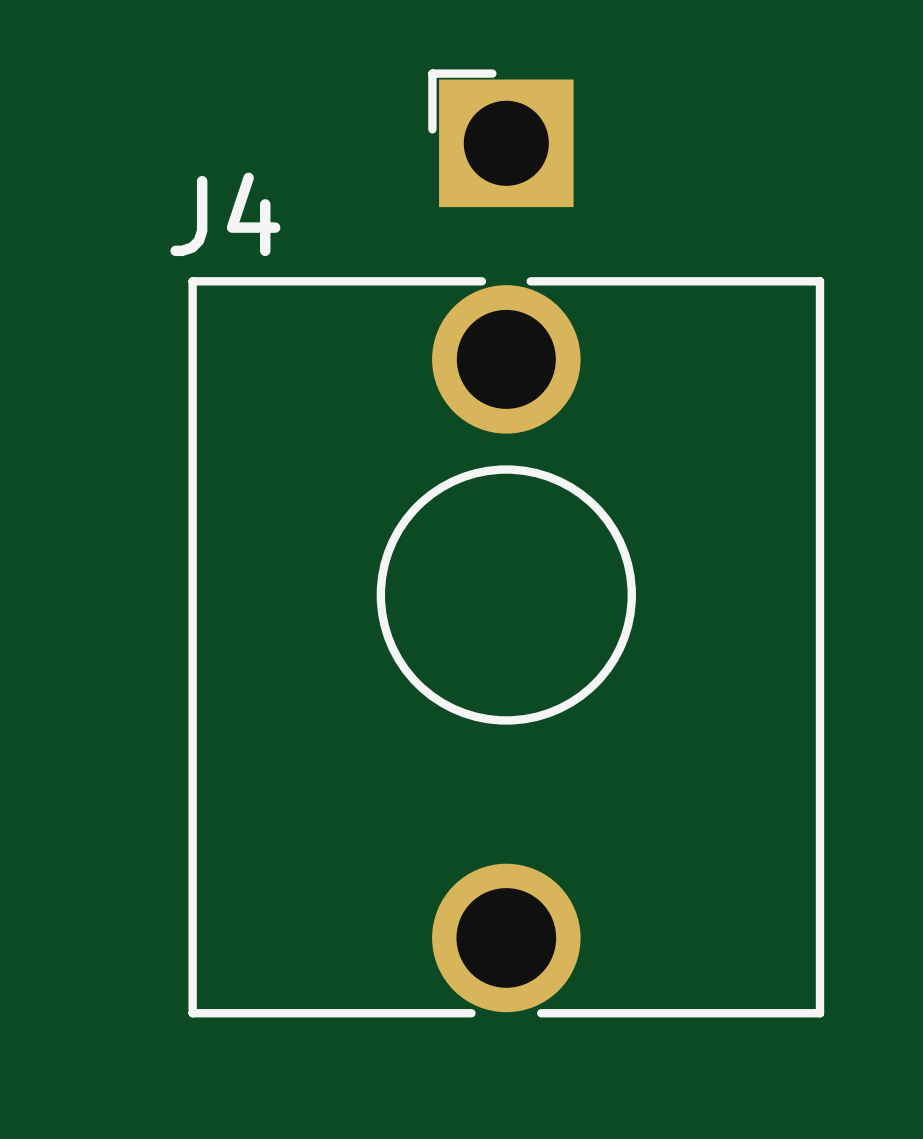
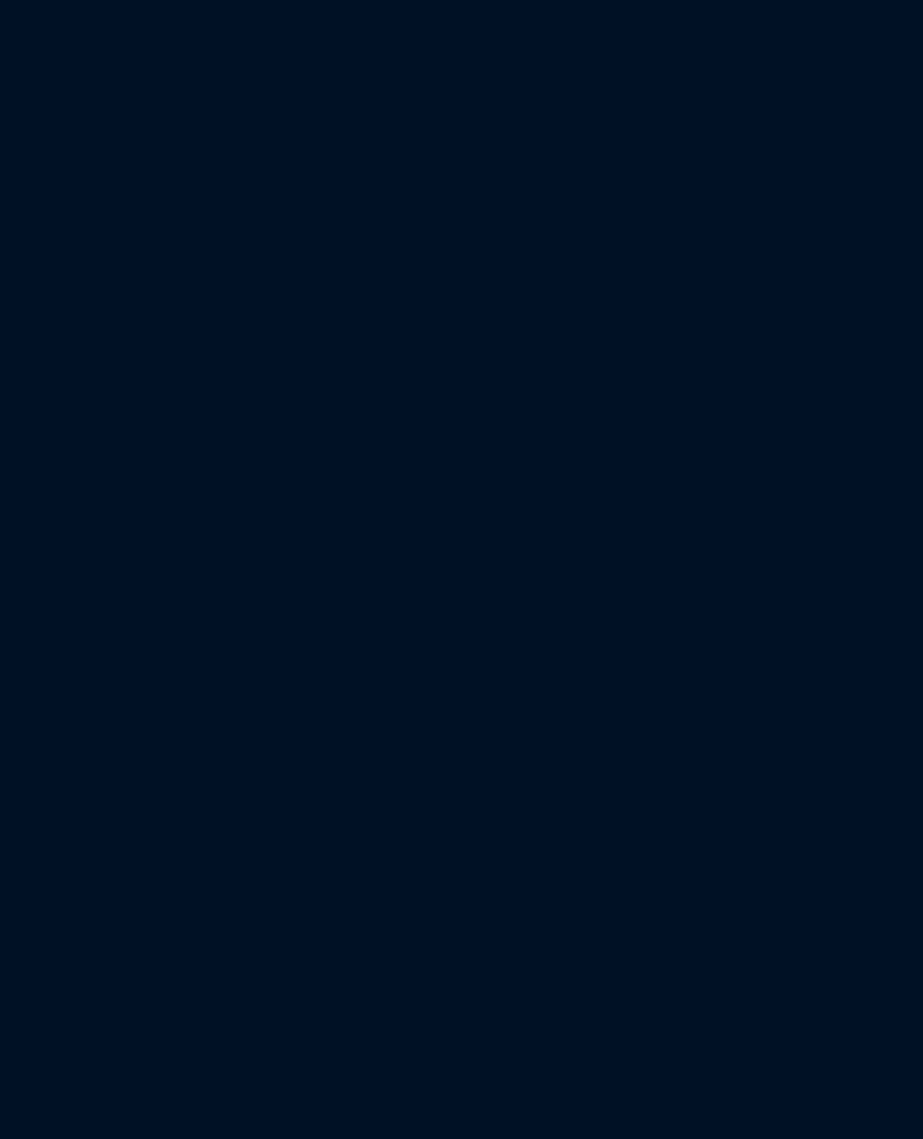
J4: (506, 543) -> none

